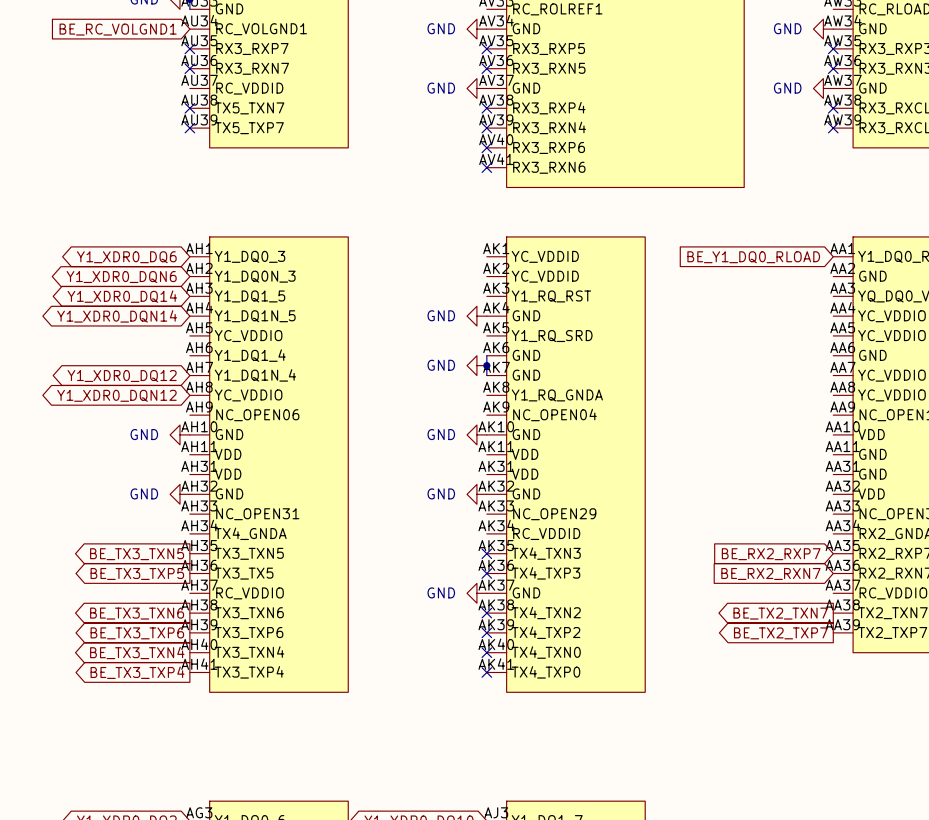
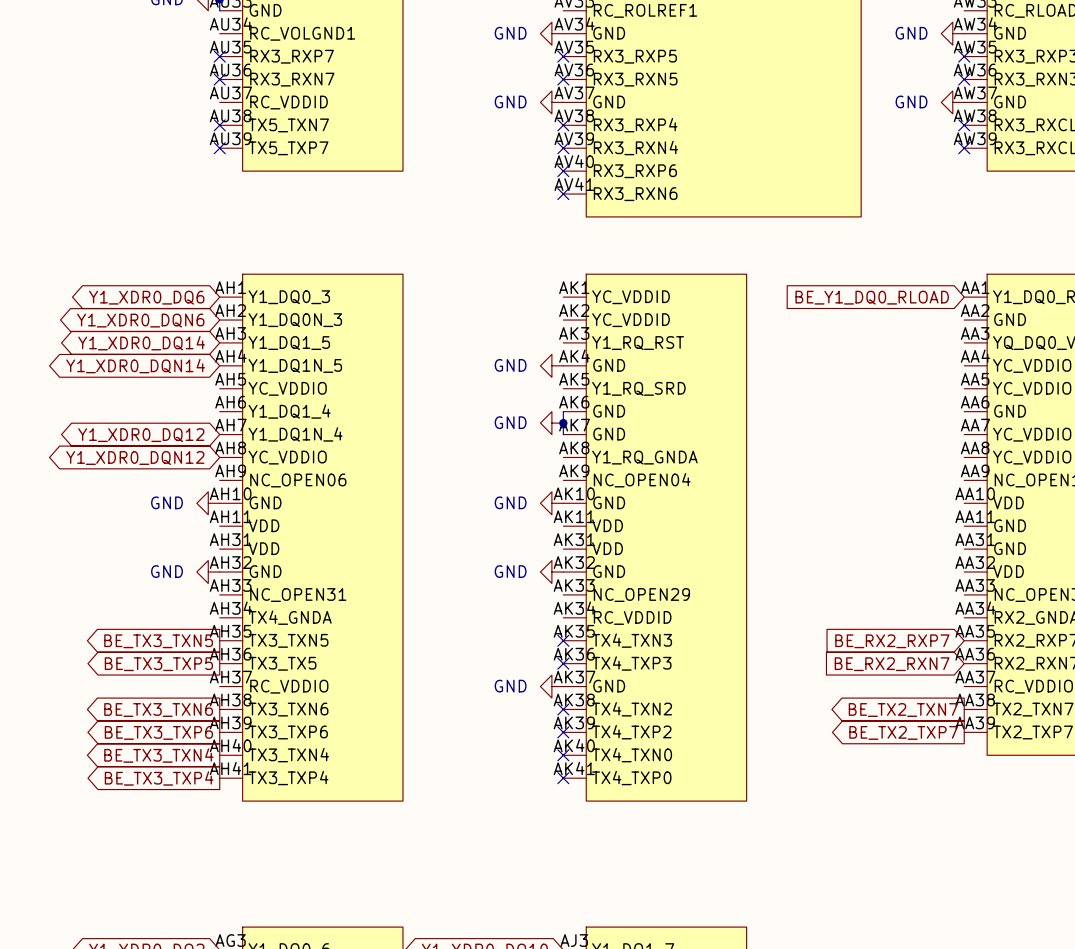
global label: BE_RC_VOLGND1 (118, 29) -> none

